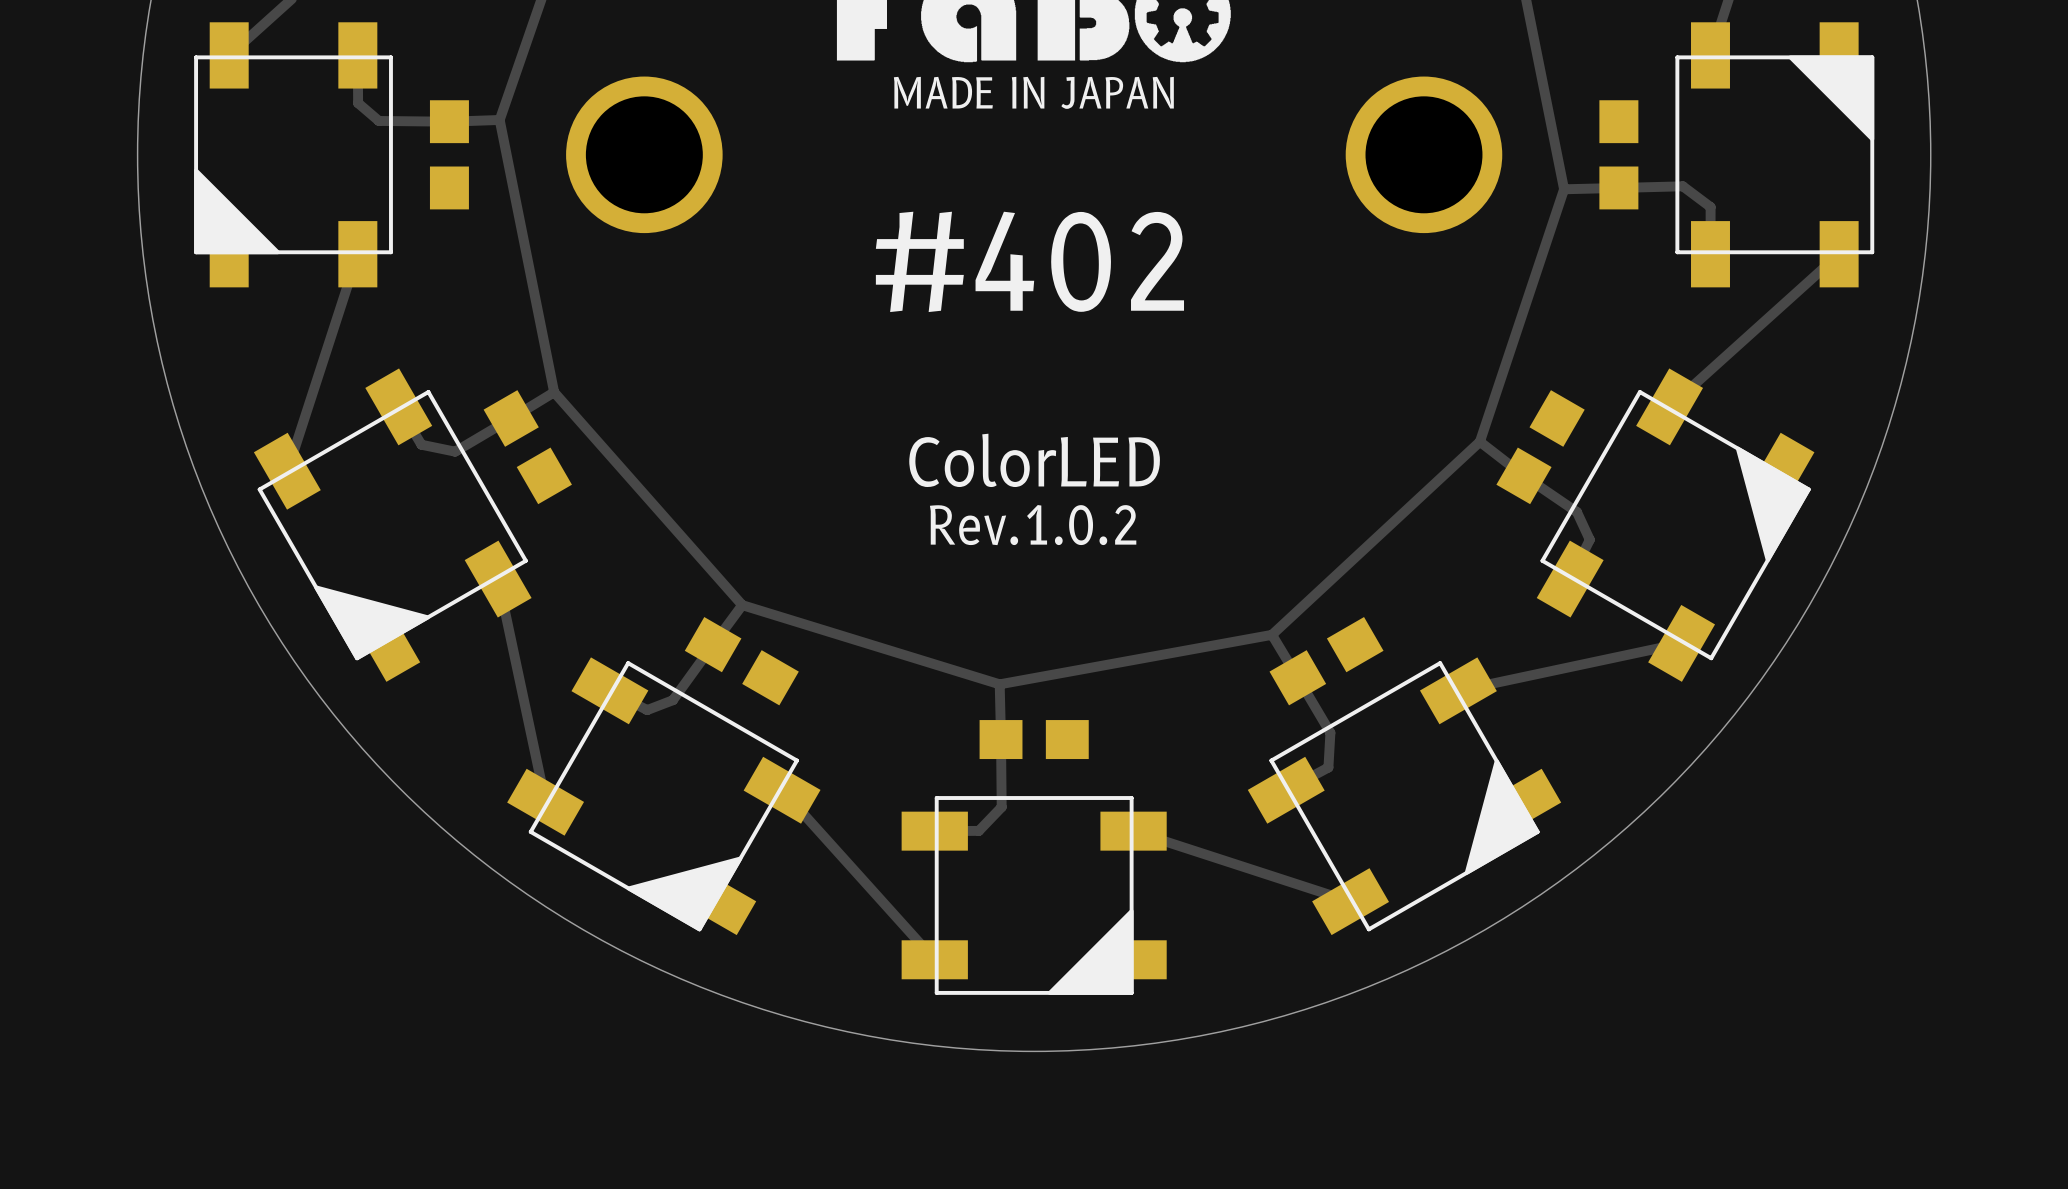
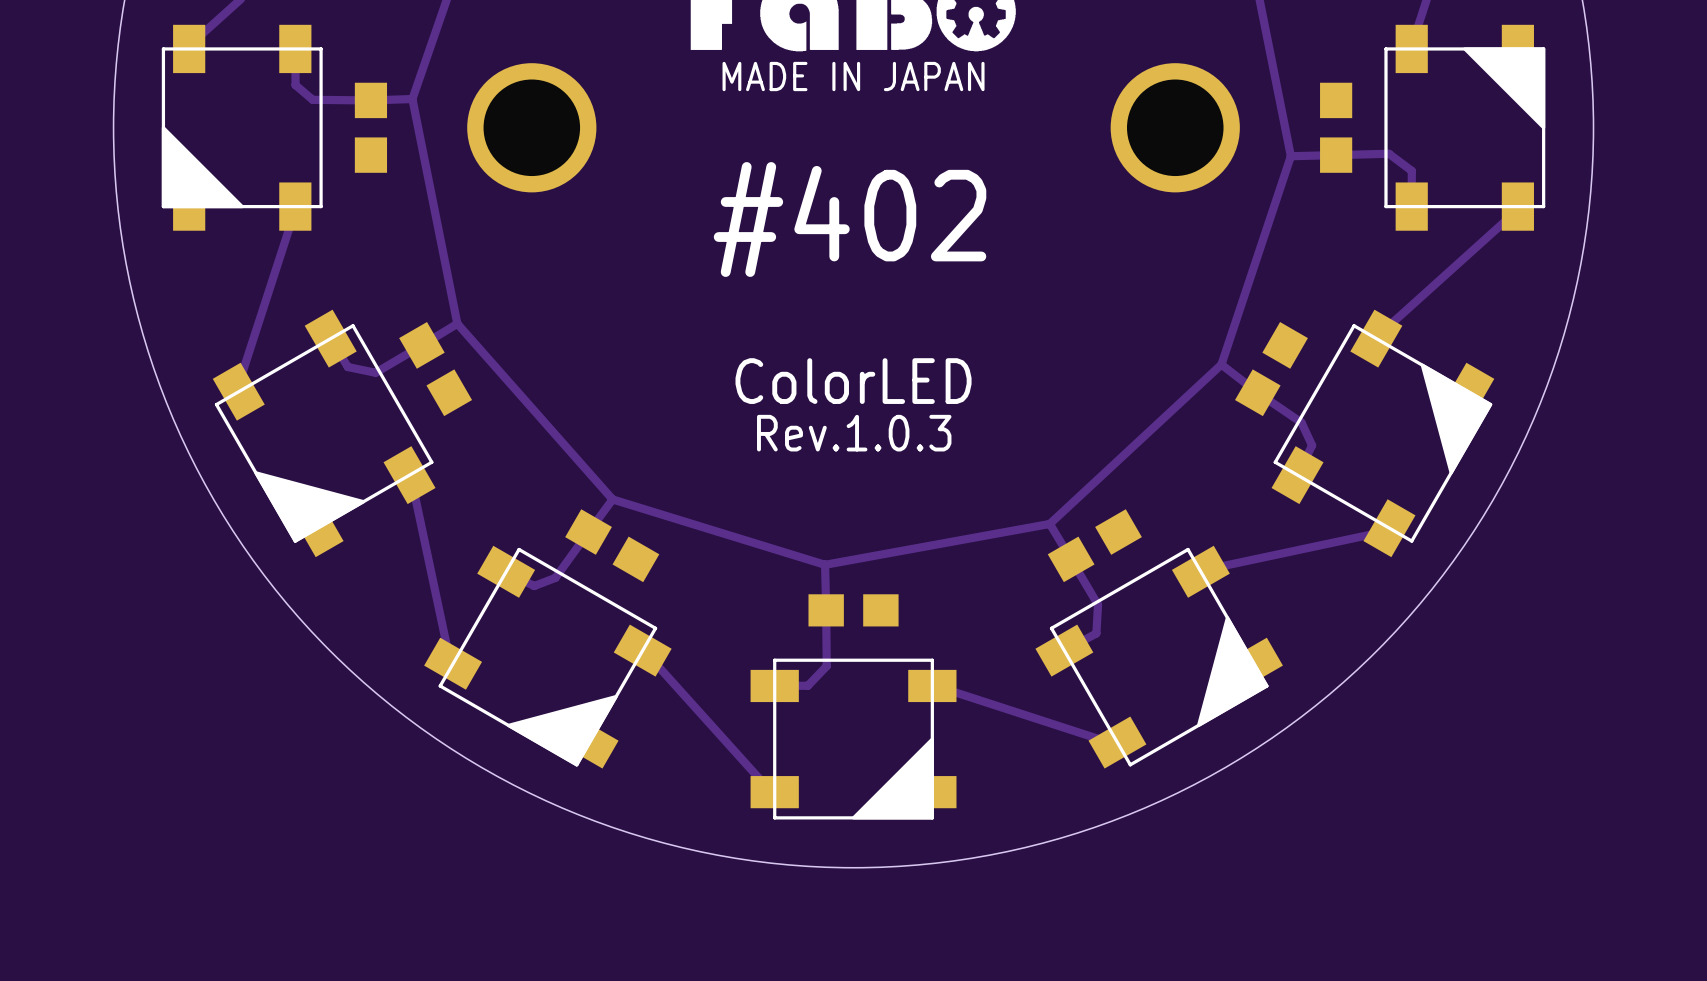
part footprint: [194, 22, 393, 288] -> [161, 24, 323, 231]
part footprint: [1675, 22, 1875, 288] -> [1384, 24, 1546, 231]
part footprint: [253, 368, 532, 682] -> [212, 309, 436, 558]
part footprint: [1536, 368, 1815, 682] -> [1271, 309, 1495, 558]
text: Rev.1.0.2 (1033, 525) -> Rev.1.0.3 (854, 433)
part footprint: [507, 657, 821, 936] -> [424, 545, 672, 769]
part footprint: [1247, 657, 1562, 936] -> [1035, 545, 1283, 769]
part footprint: [901, 796, 1167, 995] -> [750, 658, 957, 820]

